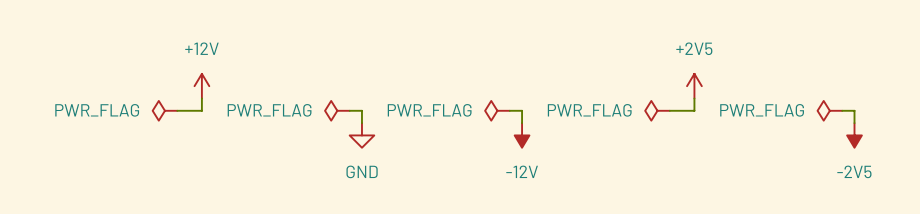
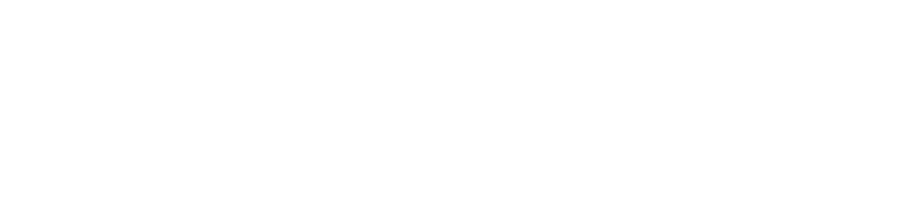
power symbol: +12V (201, 86) -> none
power symbol: +2V5 (694, 86) -> none
wire: (201, 98) (201, 110) (177, 110) -> none
wire: (694, 98) (694, 110) (669, 110) -> none
power symbol: PWR_FLAG (164, 110) -> none
power symbol: PWR_FLAG (337, 110) -> none
wire: (349, 110) (361, 110) (361, 123) -> none
power symbol: PWR_FLAG (497, 110) -> none
wire: (509, 110) (522, 110) (522, 123) -> none
power symbol: PWR_FLAG (657, 110) -> none
power symbol: PWR_FLAG (829, 110) -> none
wire: (842, 110) (854, 110) (854, 123) -> none
power symbol: GND (361, 135) -> none
power symbol: -12V (522, 135) -> none
power symbol: -2V5 (854, 135) -> none

